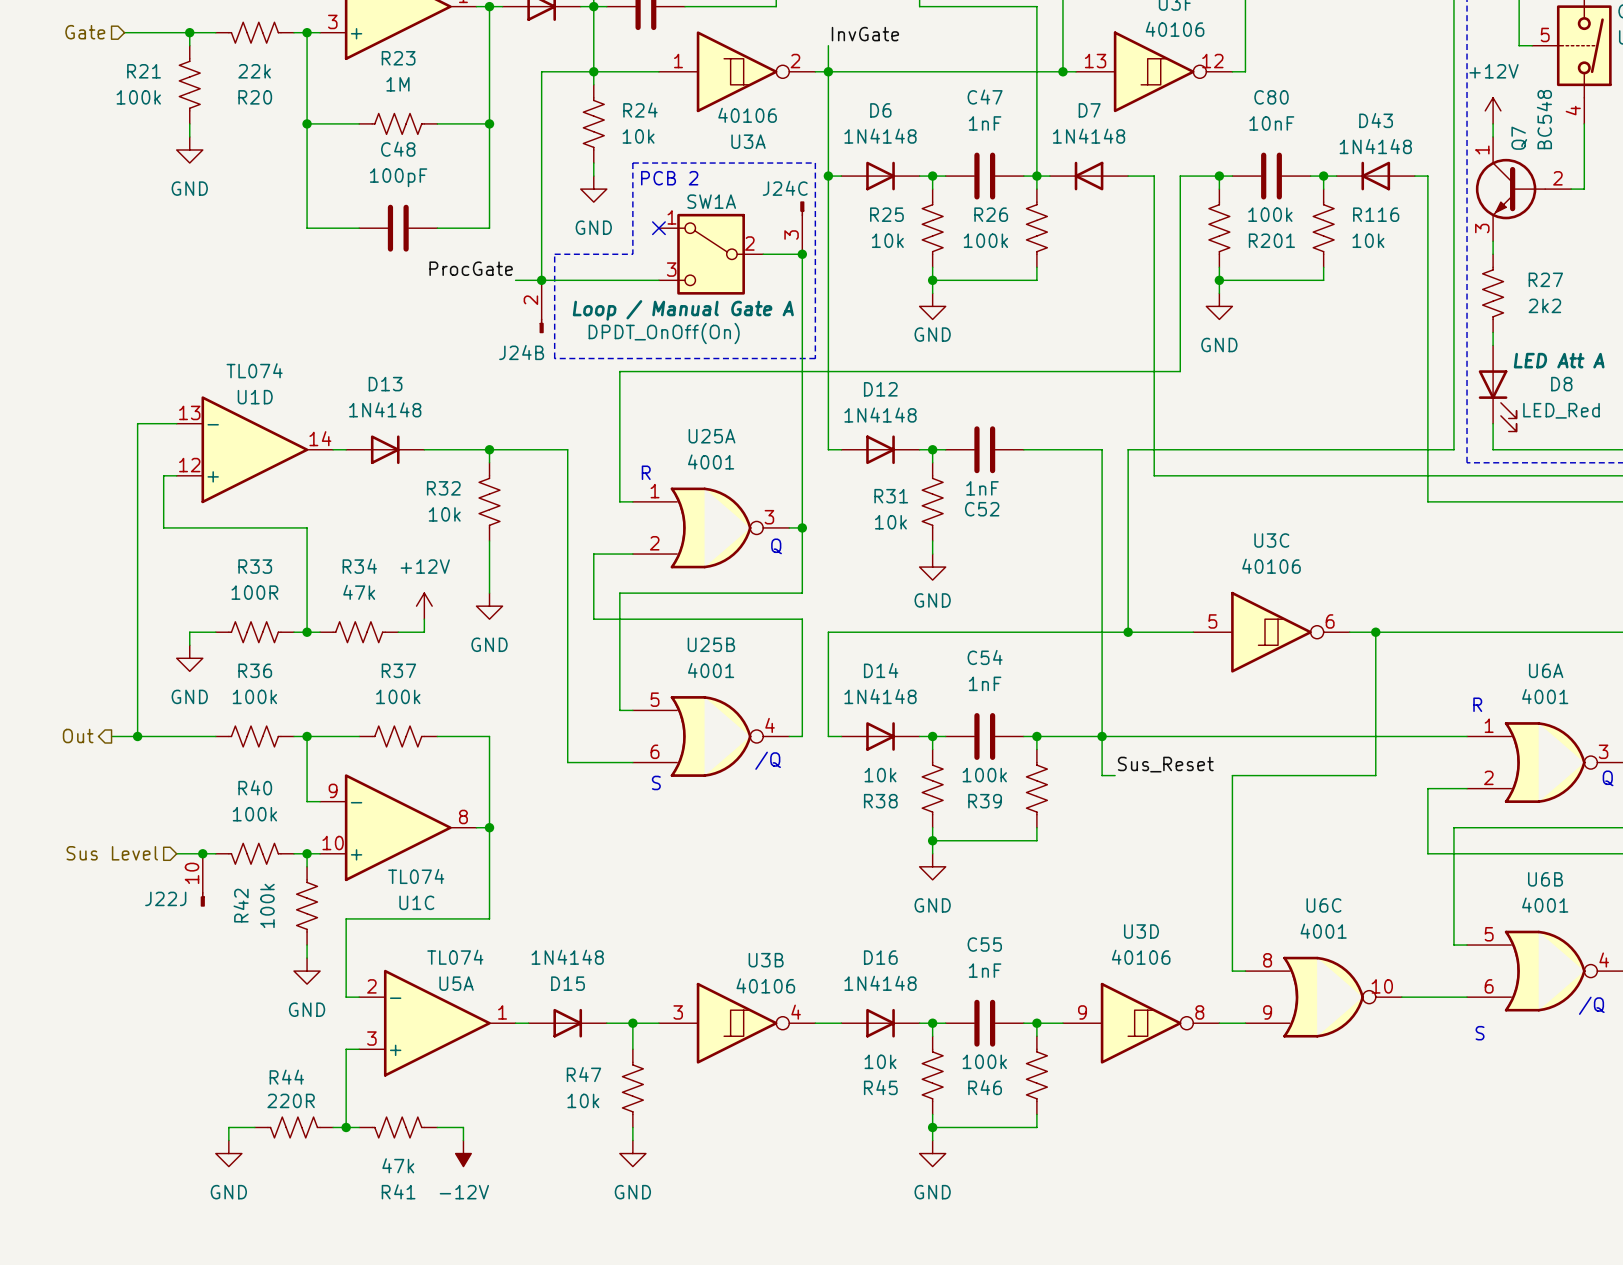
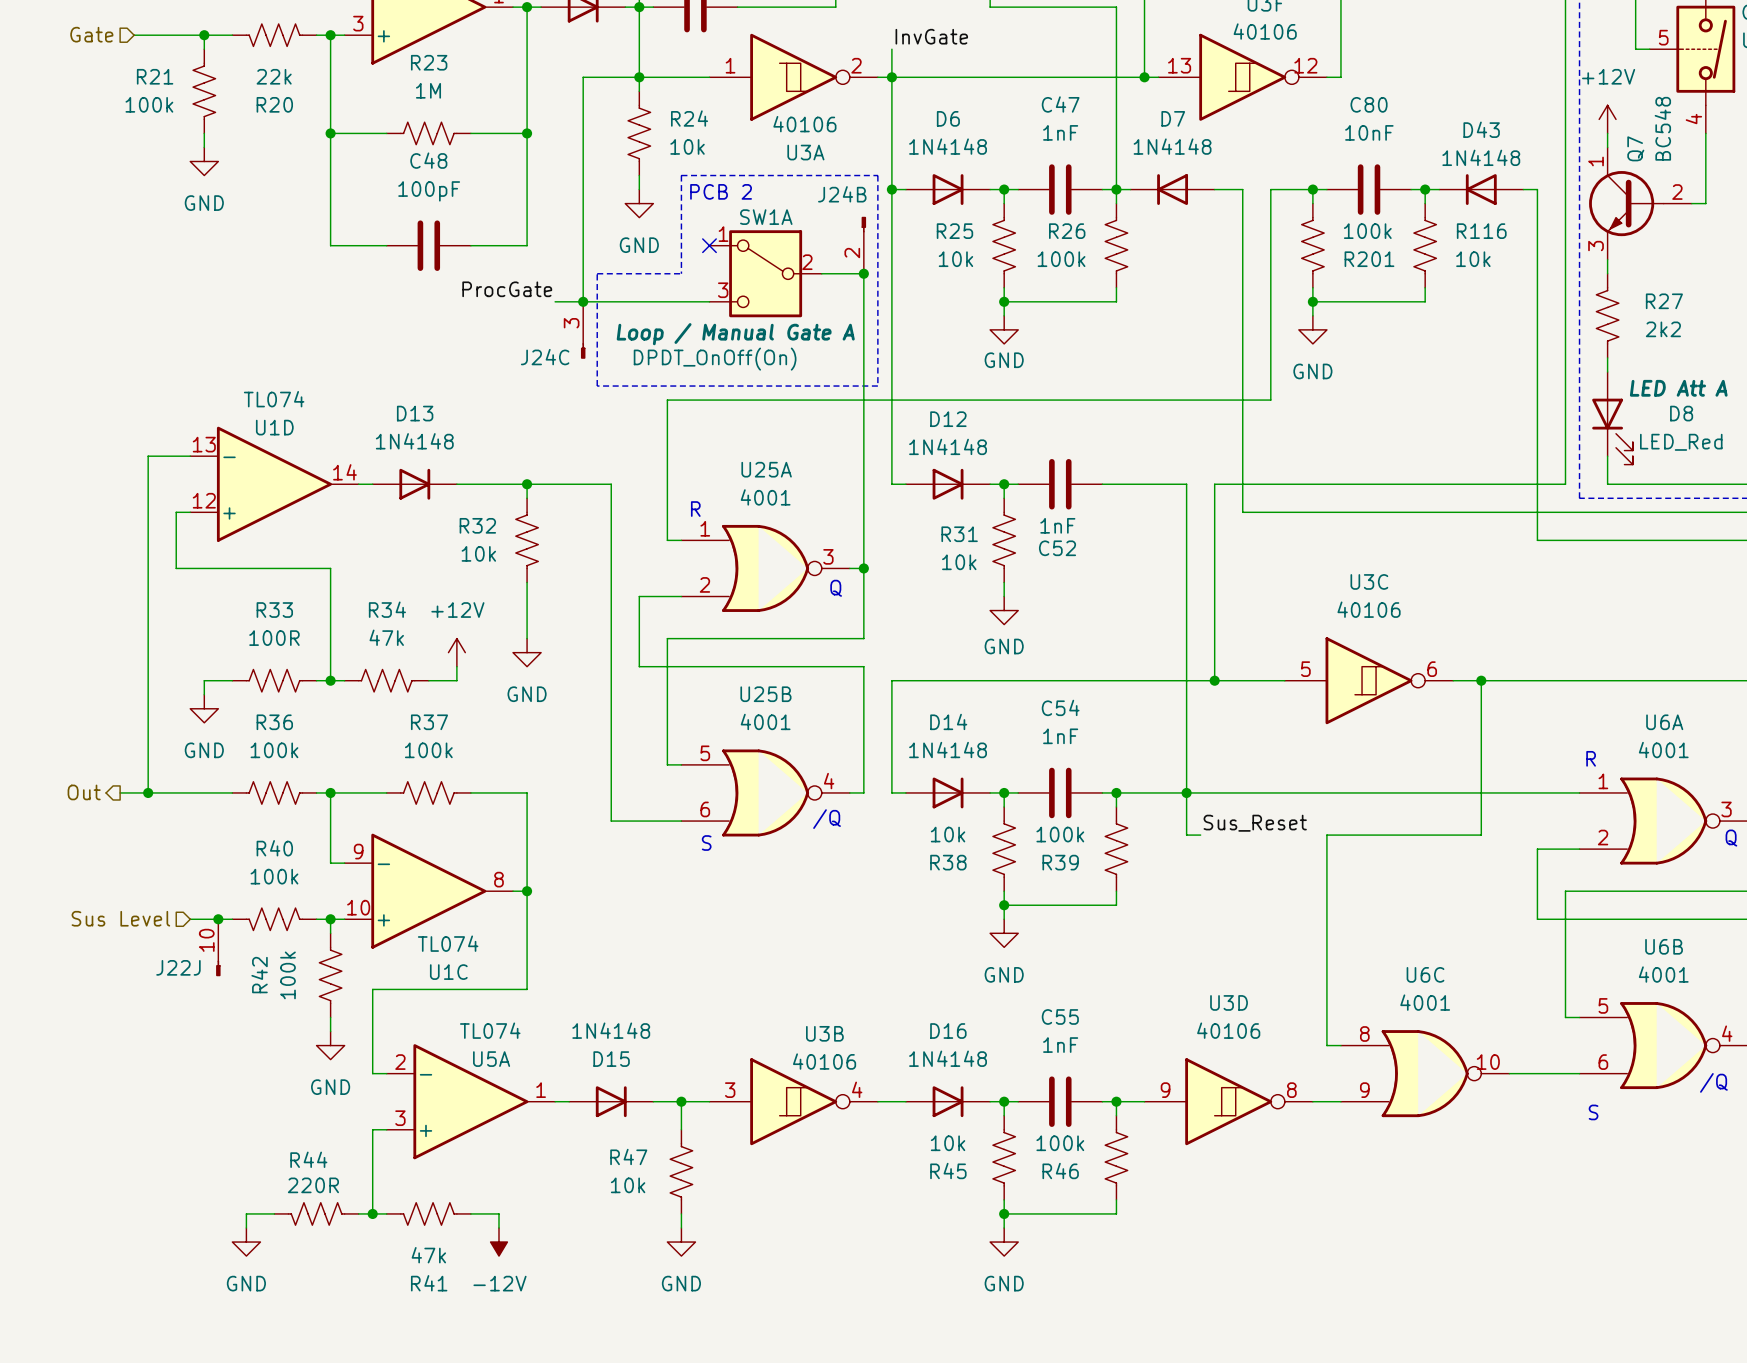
J24C name position: J24C (785, 188) -> J24C (545, 357)
J24C rotation: 0° (802, 208) -> 180° (583, 350)
J24C position: (802, 227) -> (583, 330)
J24B position: (541, 306) -> (863, 245)
J24B rotation: 0° (541, 325) -> 180° (863, 224)
J24B name position: J24B (521, 352) -> J24B (842, 194)

